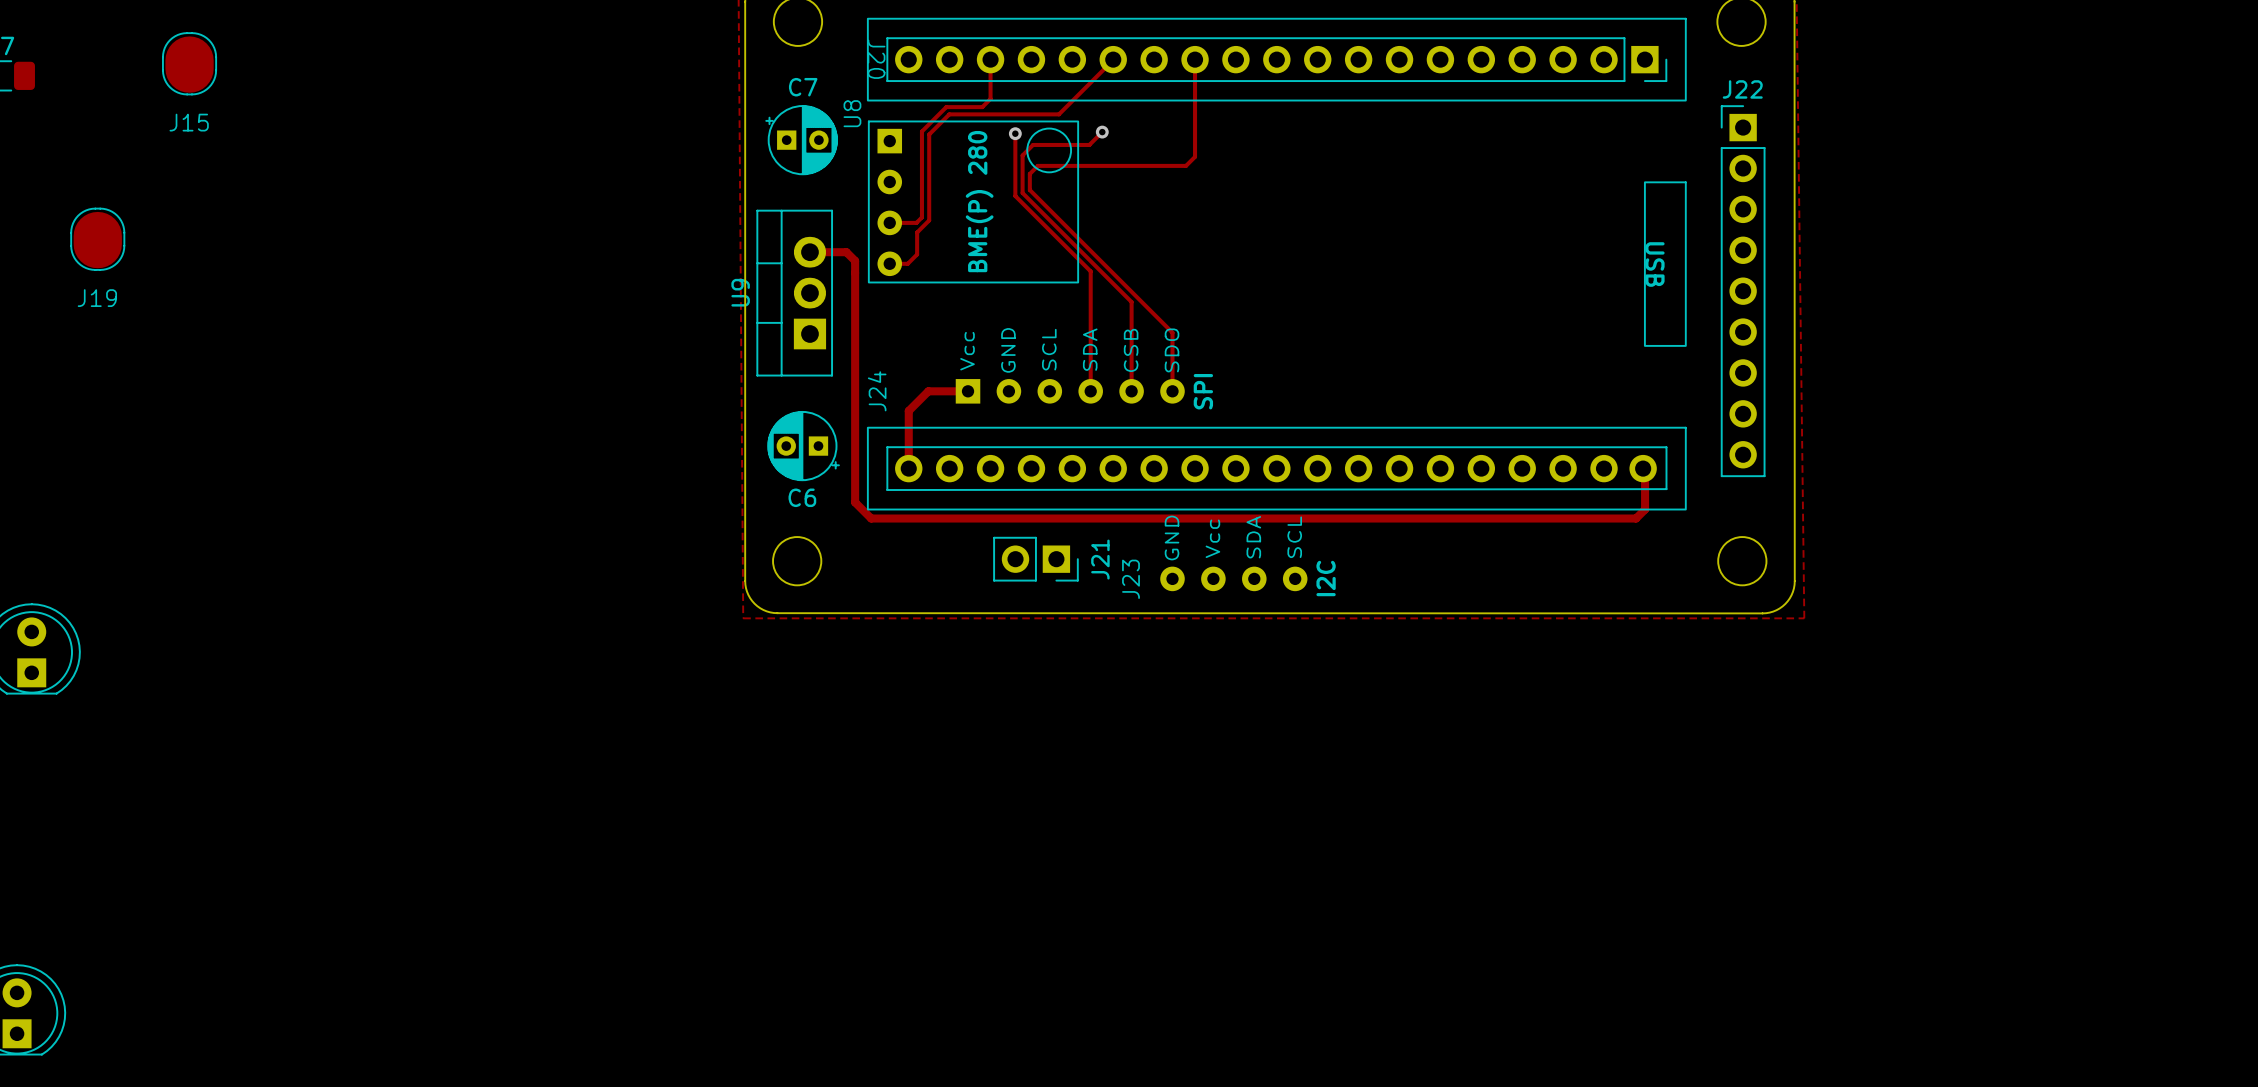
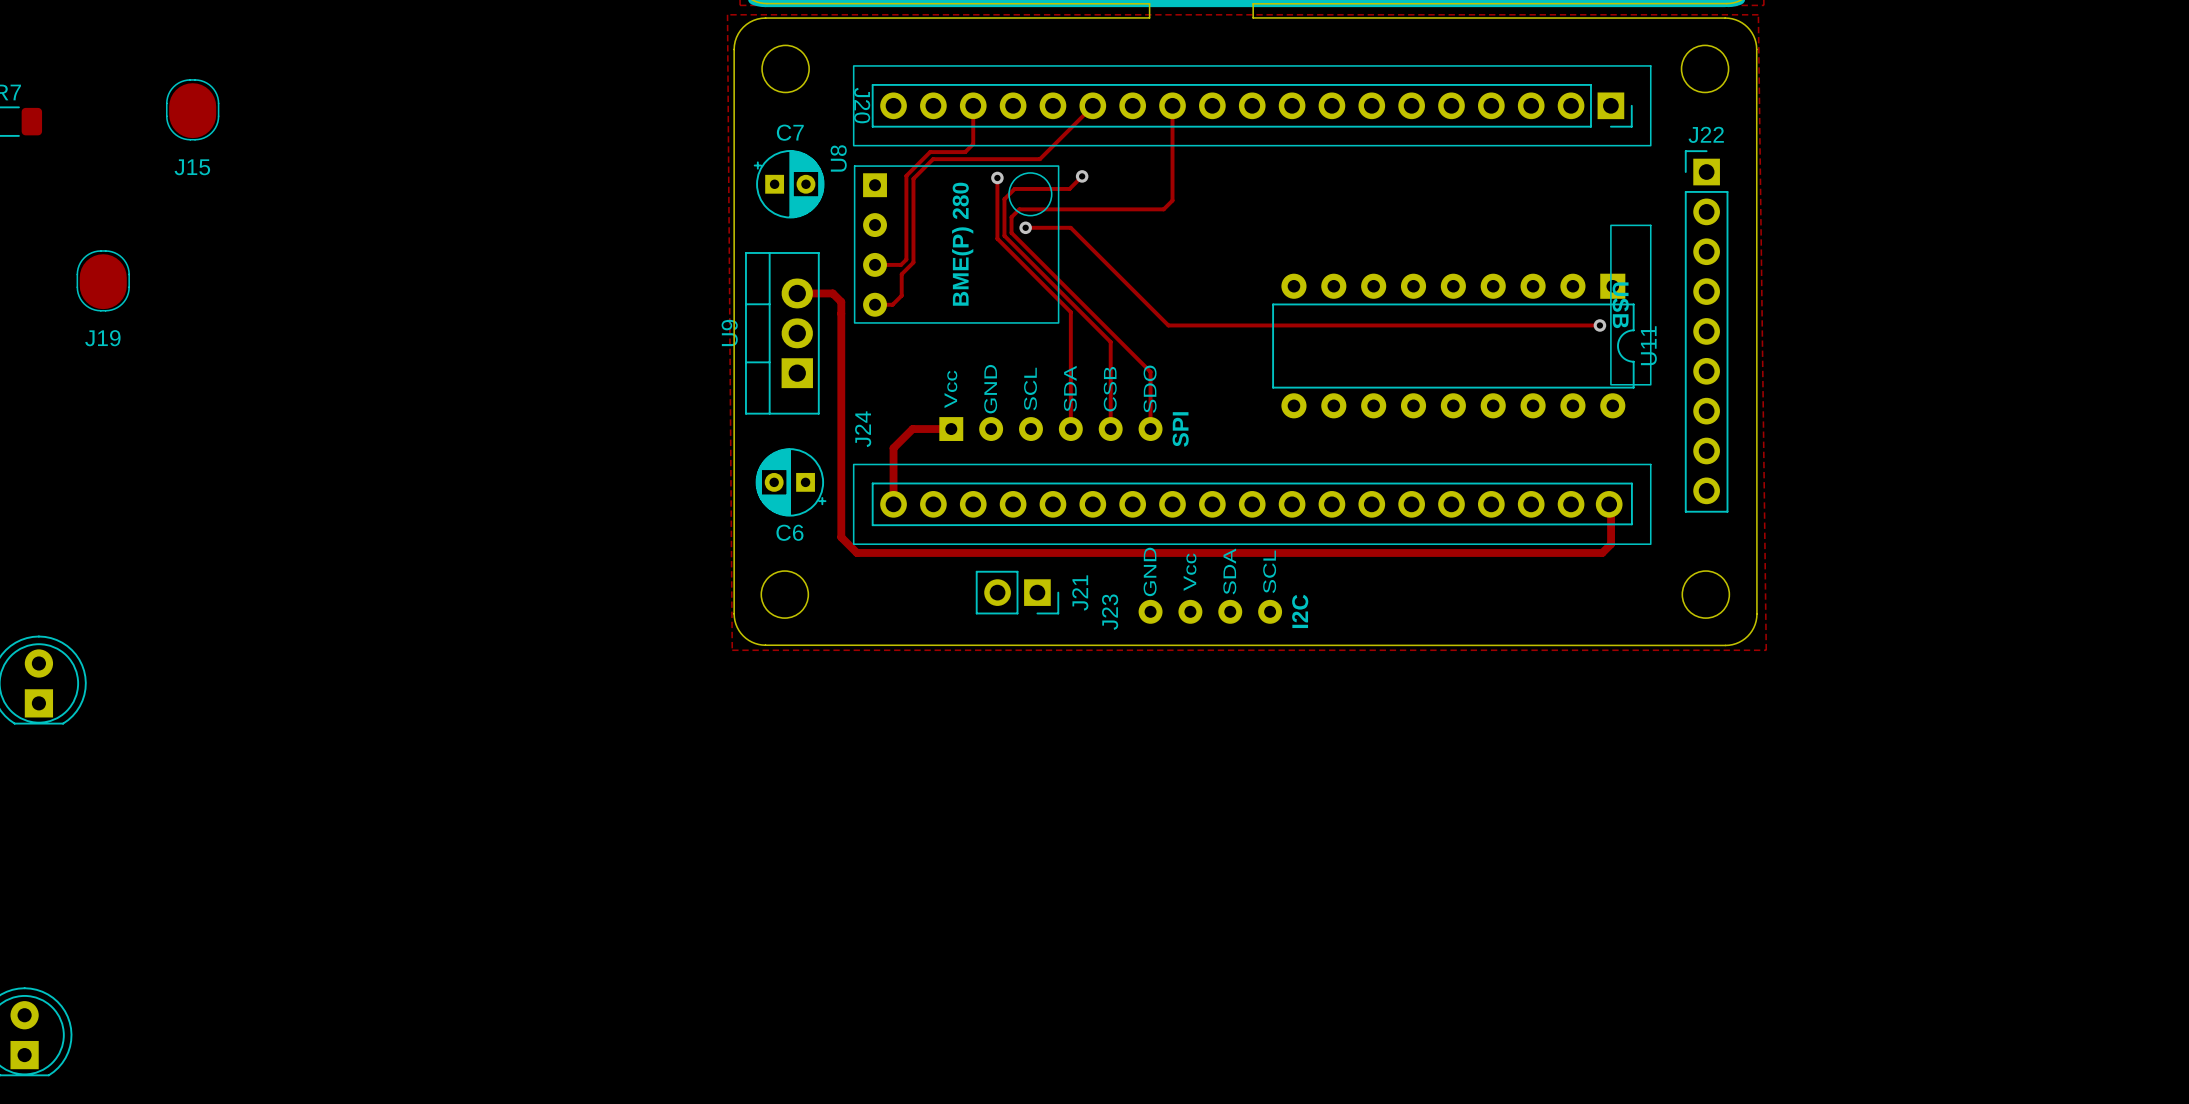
track: none -> (1025, 227) (1070, 227) (1168, 325) (1599, 325)
via: none -> (1025, 227)
via: none -> (1599, 325)
U11: none -> (1453, 346)

